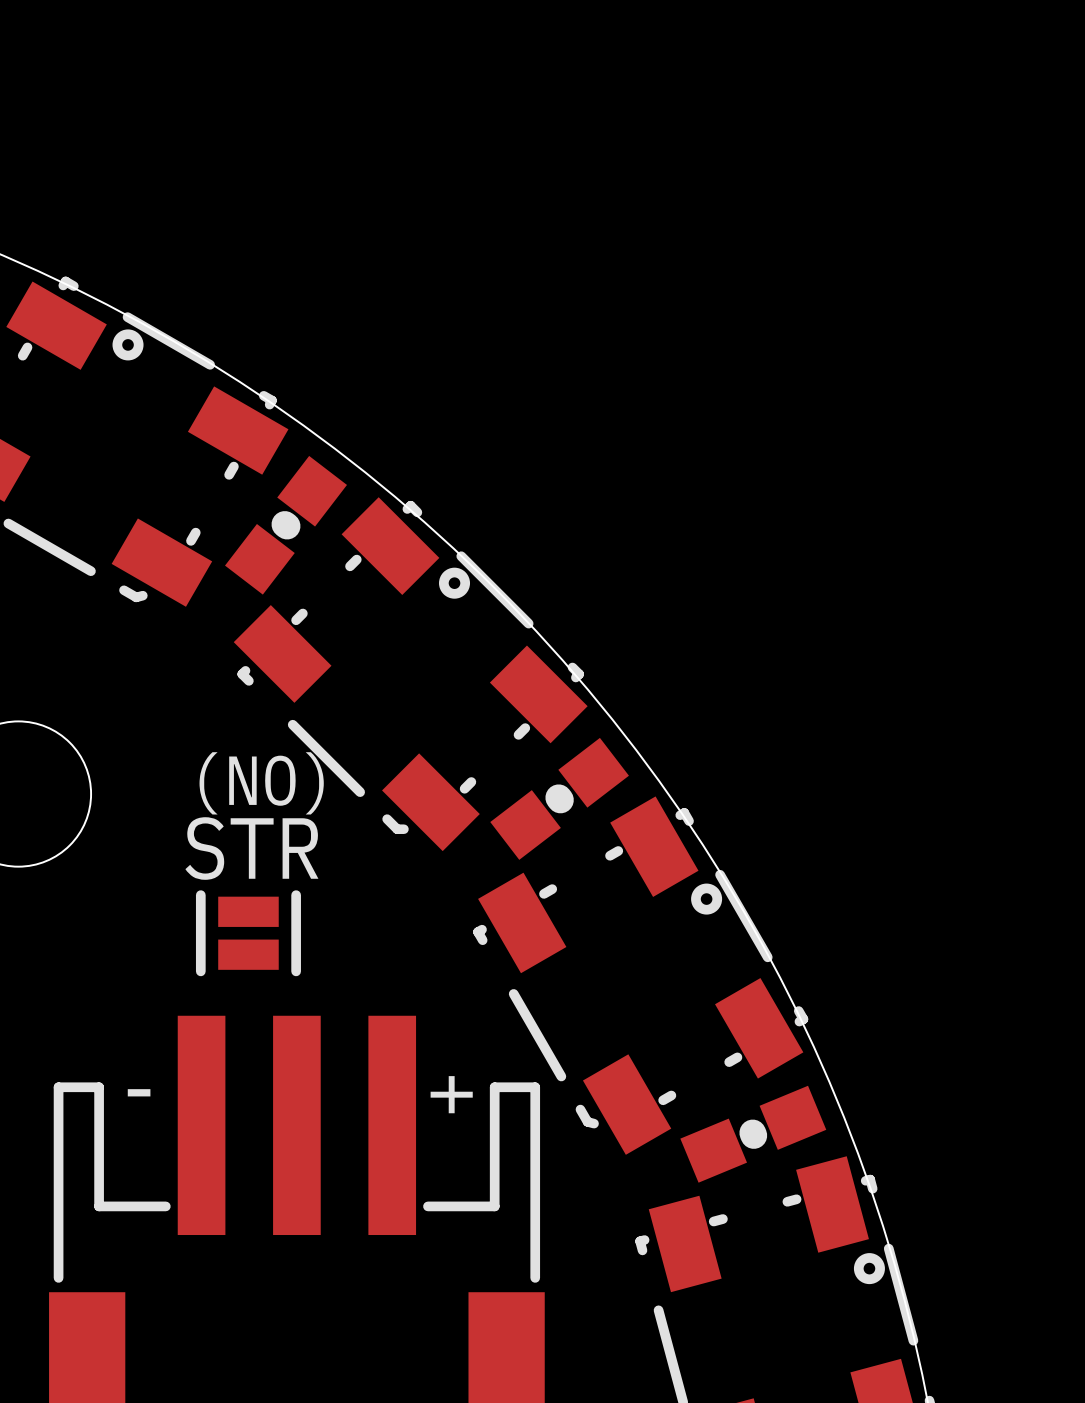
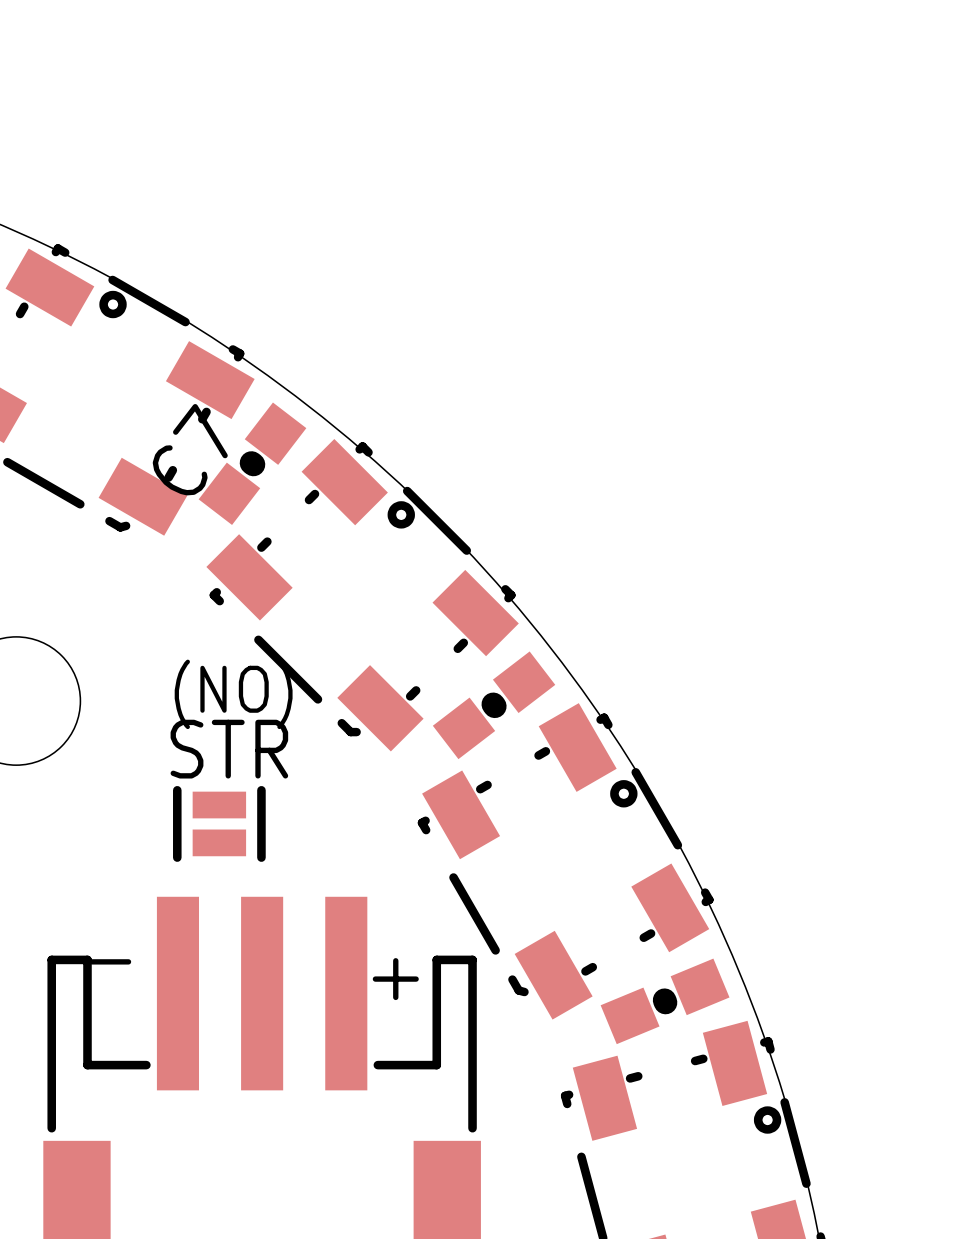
C7 name: none -> C7 (190, 449)

